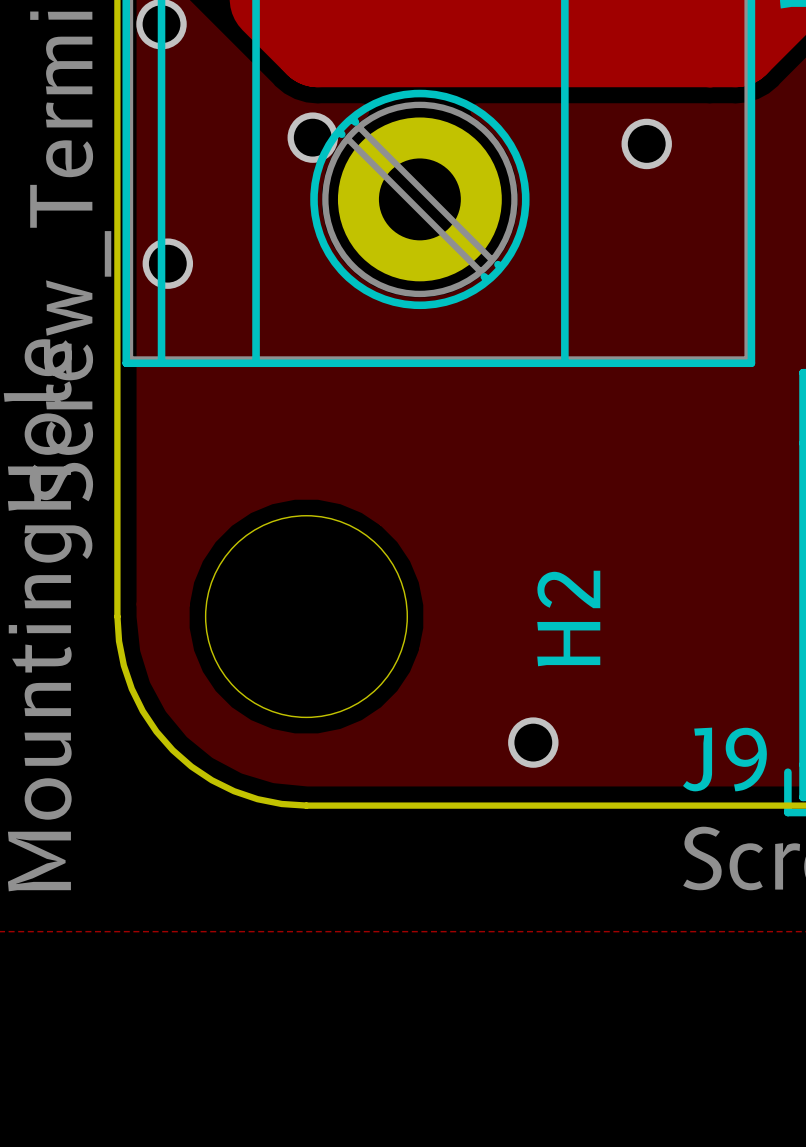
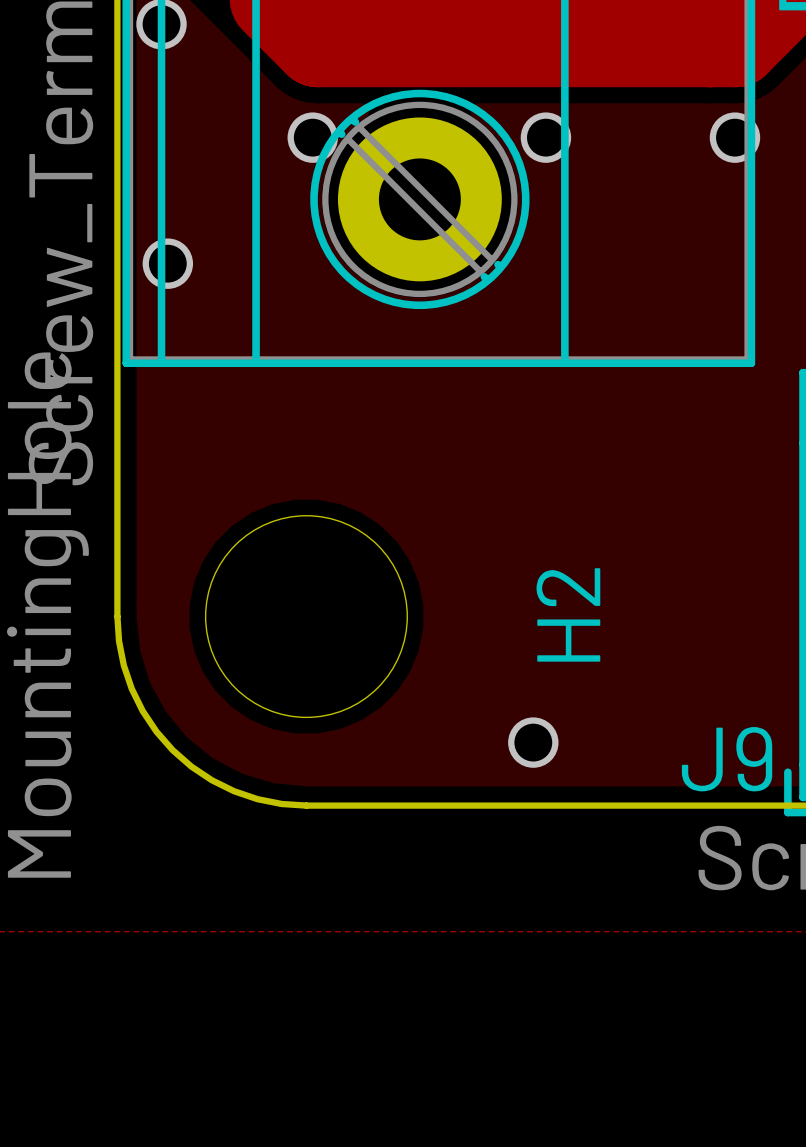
via: none -> (545, 137)
via: none -> (734, 137)
via: (646, 143) -> none

